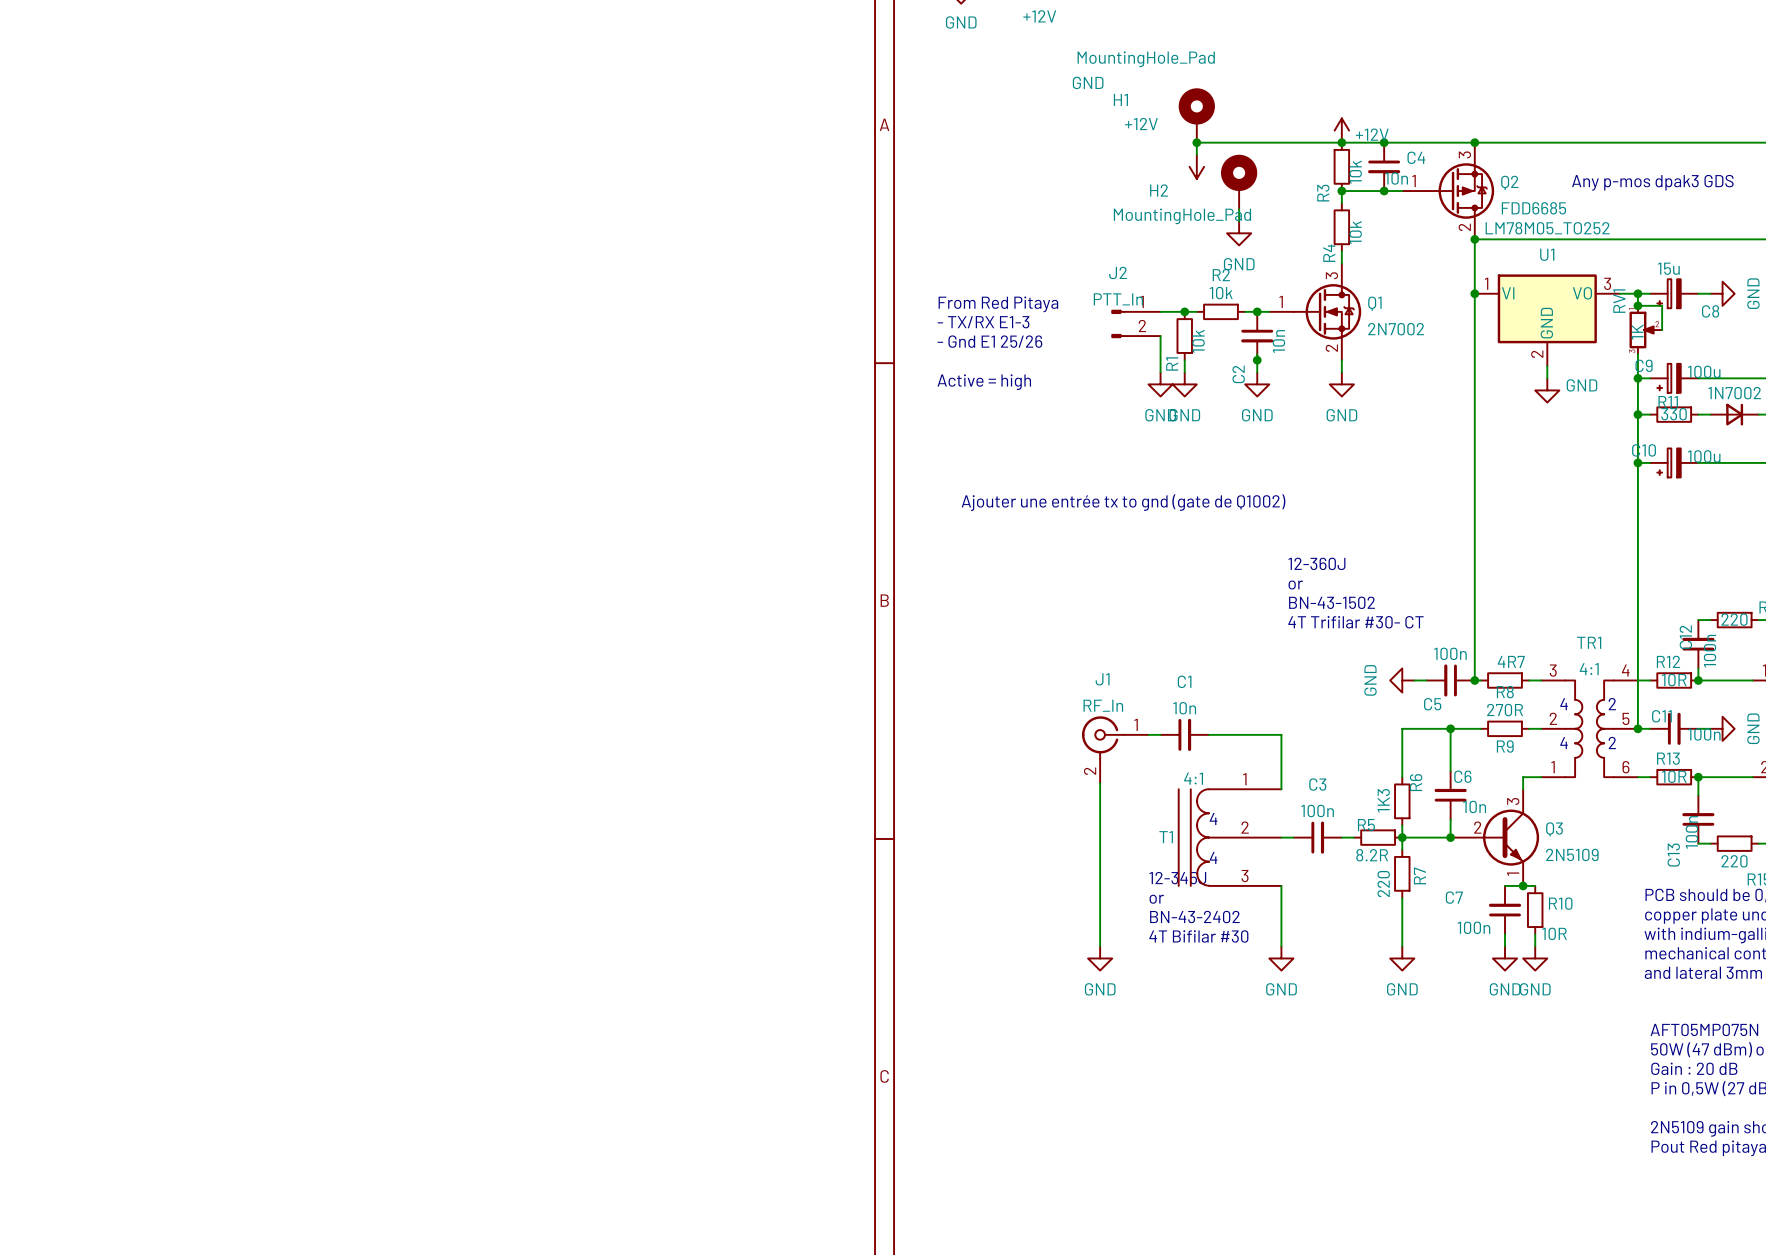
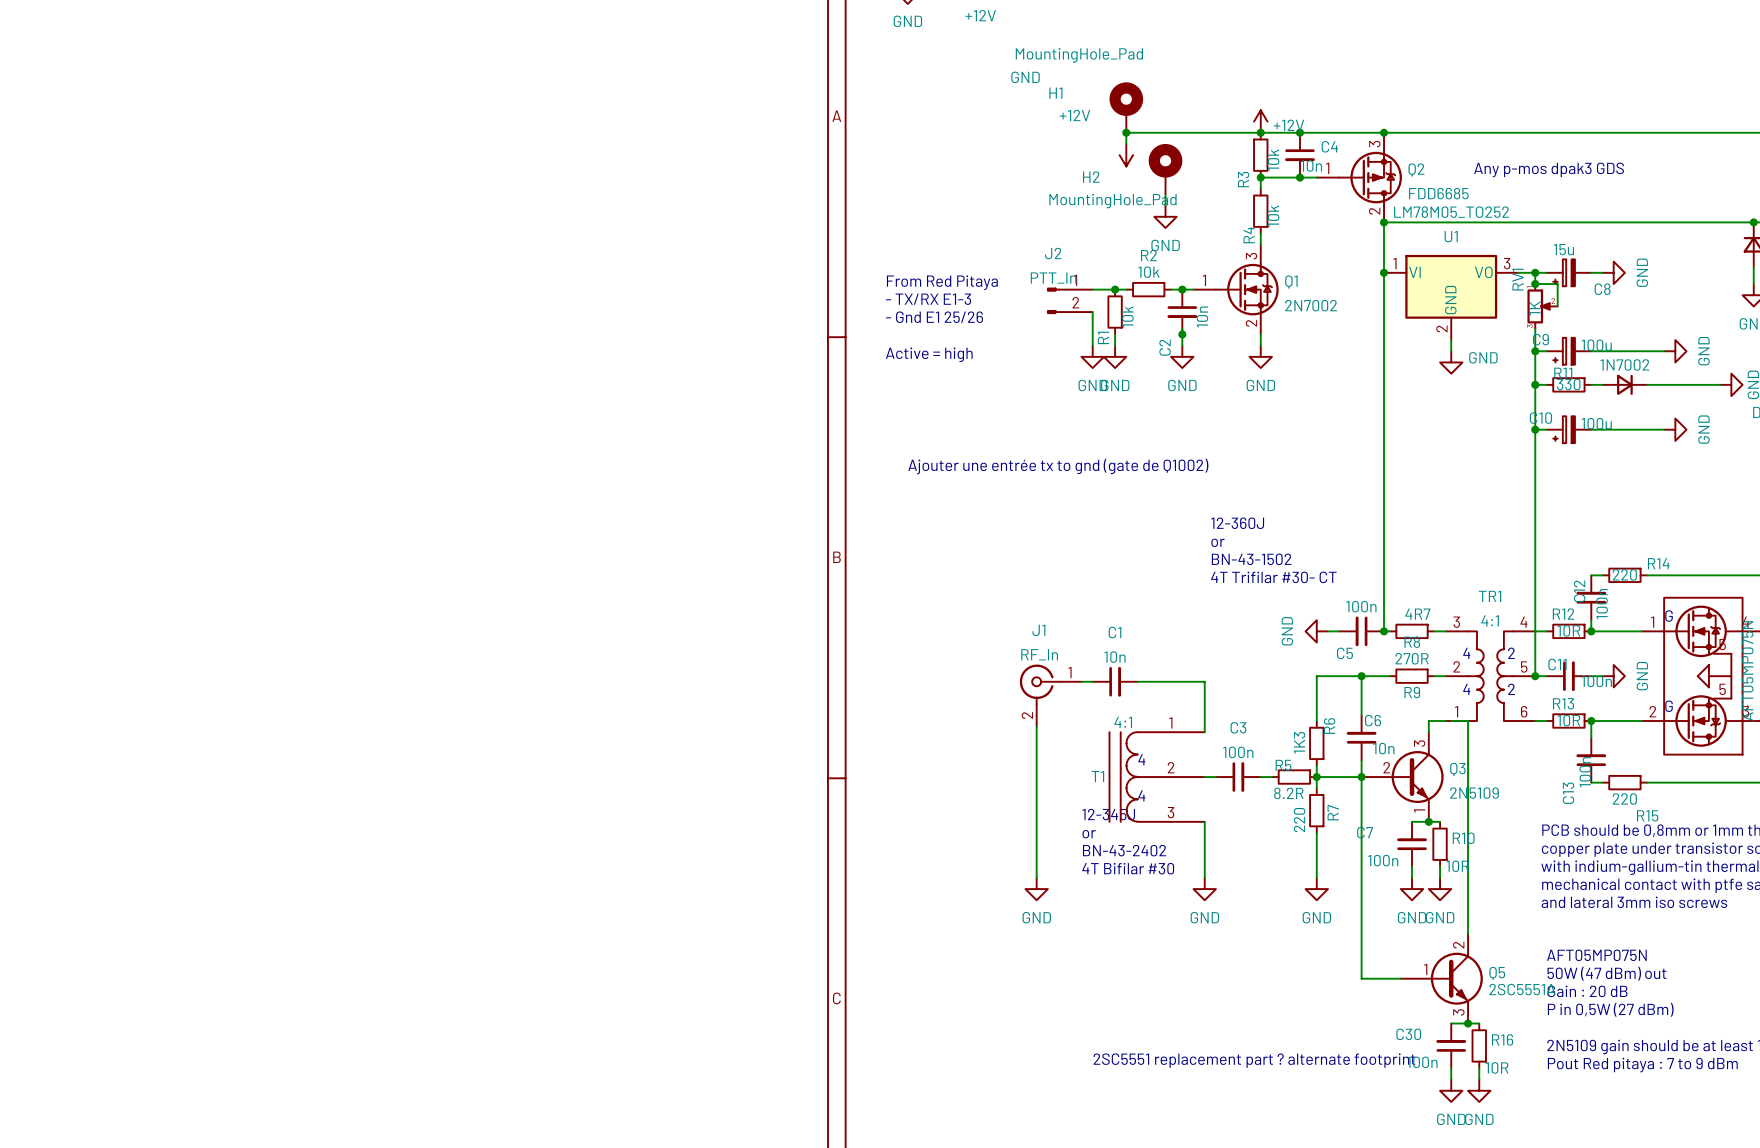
wire: none -> (1451, 721) (1468, 721) (1468, 933)
wire: none -> (1361, 777) (1361, 978) (1400, 978)
Q5: none -> 2SC5551A (1441, 978)
wire: none -> (1451, 1023) (1479, 1023)
junction: none -> (1468, 1023)
C30: none -> 100n (1451, 1045)
R16: none -> 10R (1479, 1045)
text: none -> 2SC5551 replacement part ? alternate footprint (1254, 1060)
wire: none -> (1451, 1068) (1451, 1079)
wire: none -> (1479, 1068) (1479, 1079)
power symbol: none -> GND (1451, 1090)
power symbol: none -> GND (1479, 1090)

